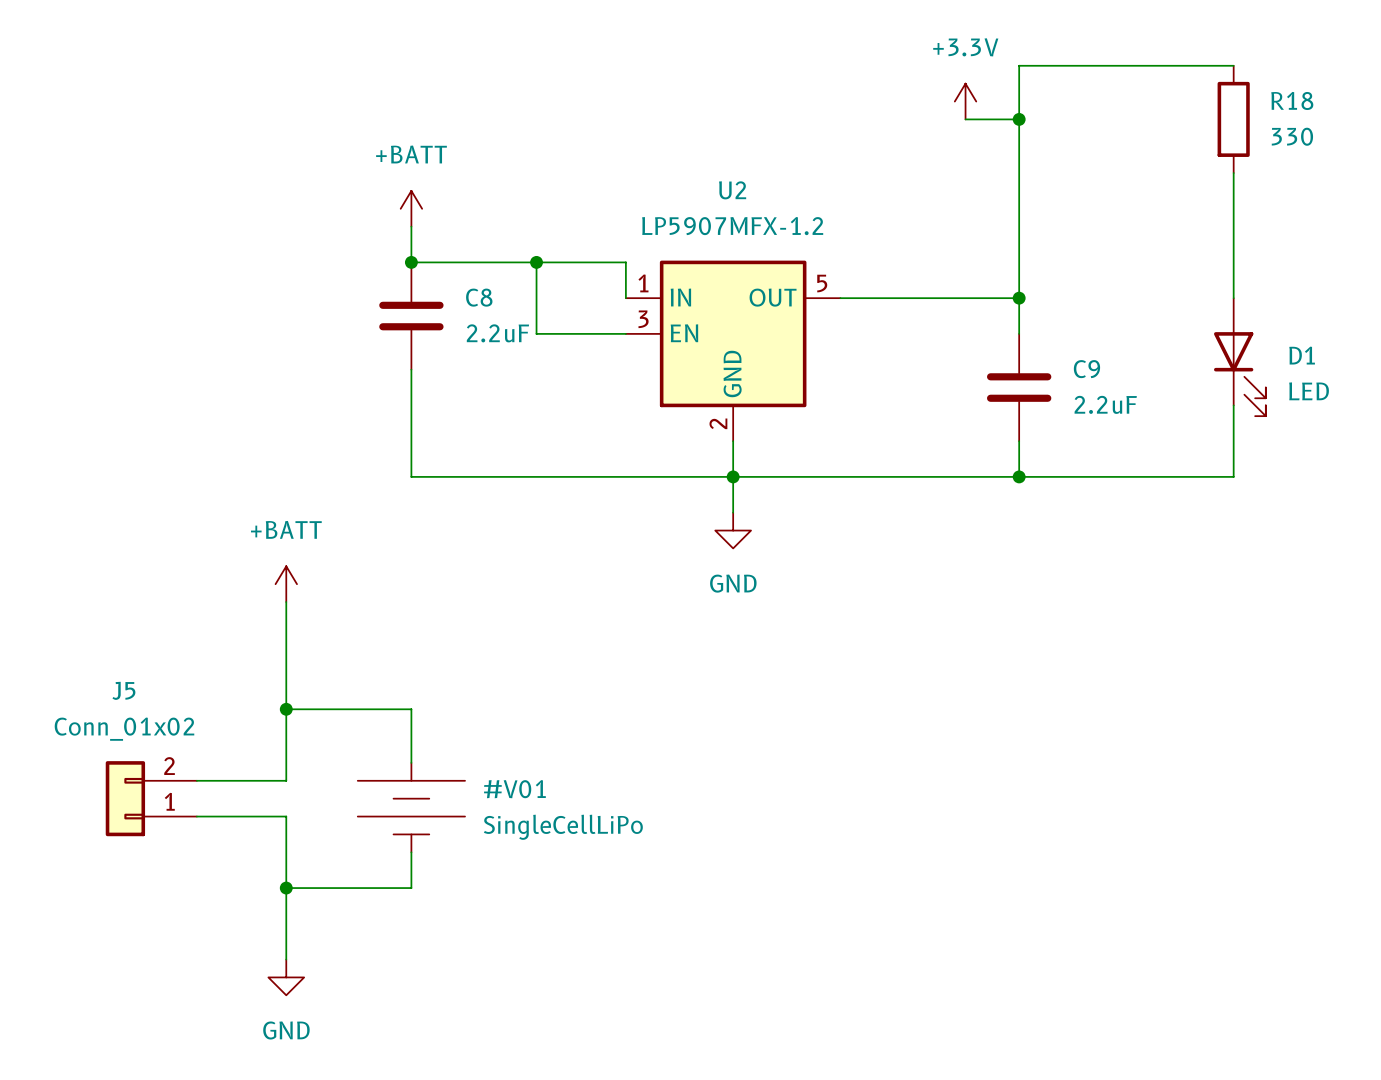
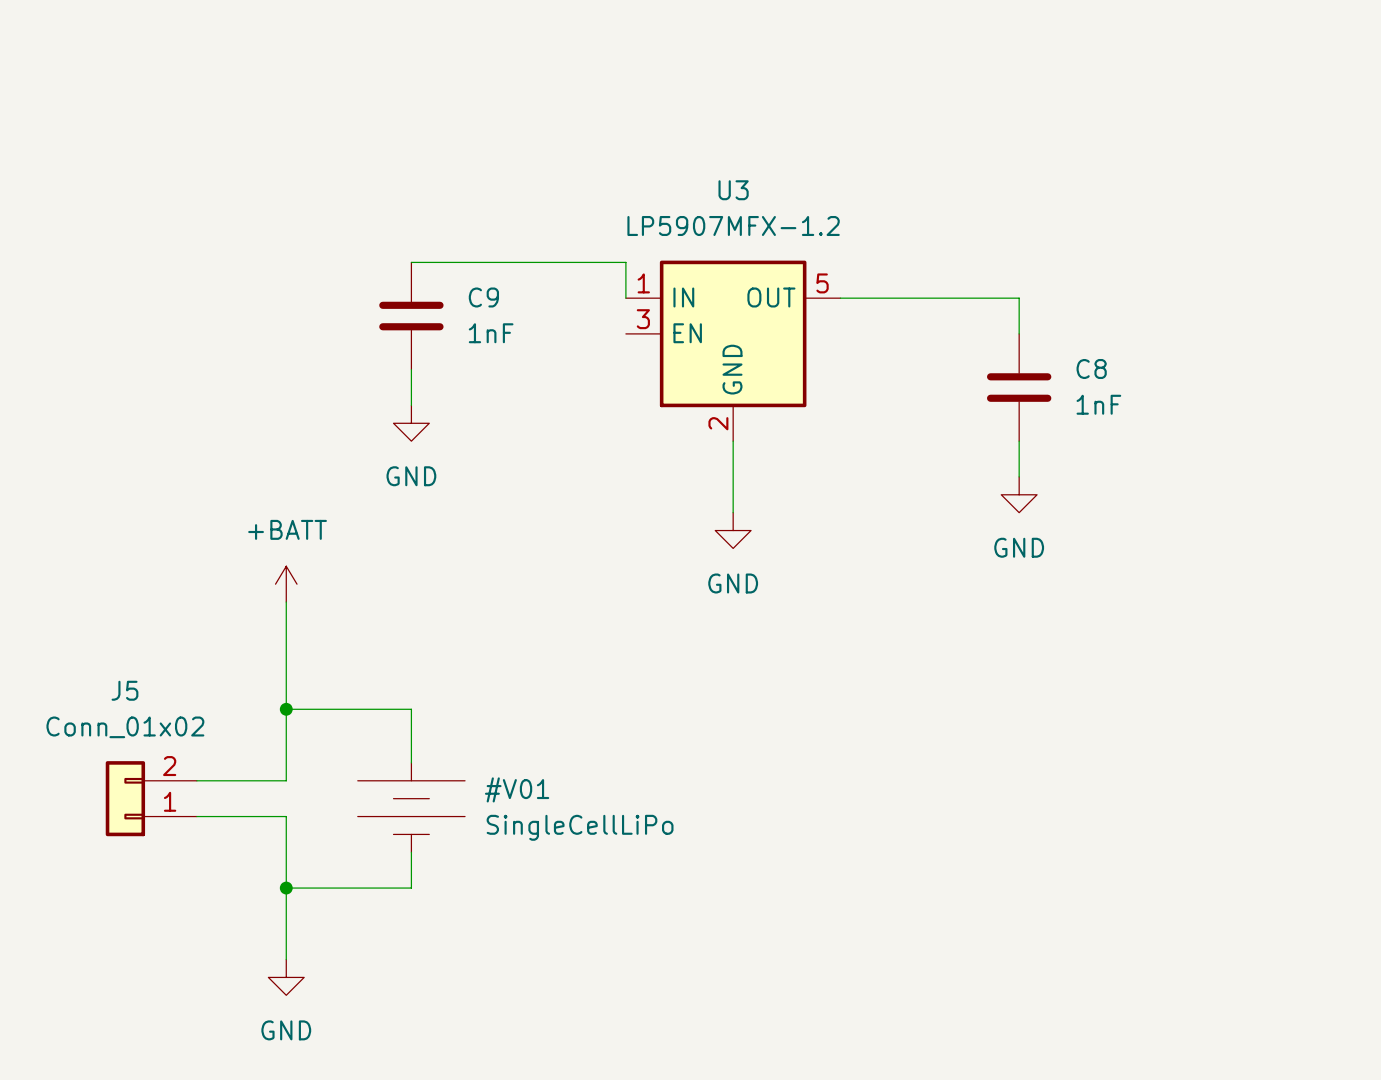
wire: (1233, 65) (1019, 65) (1019, 298) -> none
power symbol: +3.3V (965, 101) -> none
wire: (965, 119) (1019, 119) -> none
junction: (1019, 119) -> none
R18: 330 (1233, 119) -> none
wire: (1233, 173) (1233, 298) -> none
U2 name: U2 (732, 190) -> U3 (733, 190)
power symbol: +BATT (411, 208) -> none
wire: (411, 226) (411, 262) -> none
junction: (411, 262) -> none
wire: (536, 262) (536, 333) (625, 333) -> none
junction: (536, 262) -> none
C8 name: C8 (479, 297) -> C9 (483, 297)
junction: (1019, 298) -> none
C8 value: 2.2uF (497, 333) -> 1nF (491, 333)
D1: LED (1239, 357) -> none
C9 name: C9 (1086, 369) -> C8 (1091, 368)
C9 value: 2.2uF (1105, 404) -> 1nF (1098, 404)
wire: (411, 405) (411, 476) (1233, 476) (1233, 405) -> none
power symbol: none -> GND (411, 423)
junction: (733, 476) -> none
junction: (1019, 476) -> none
power symbol: none -> GND (1019, 494)

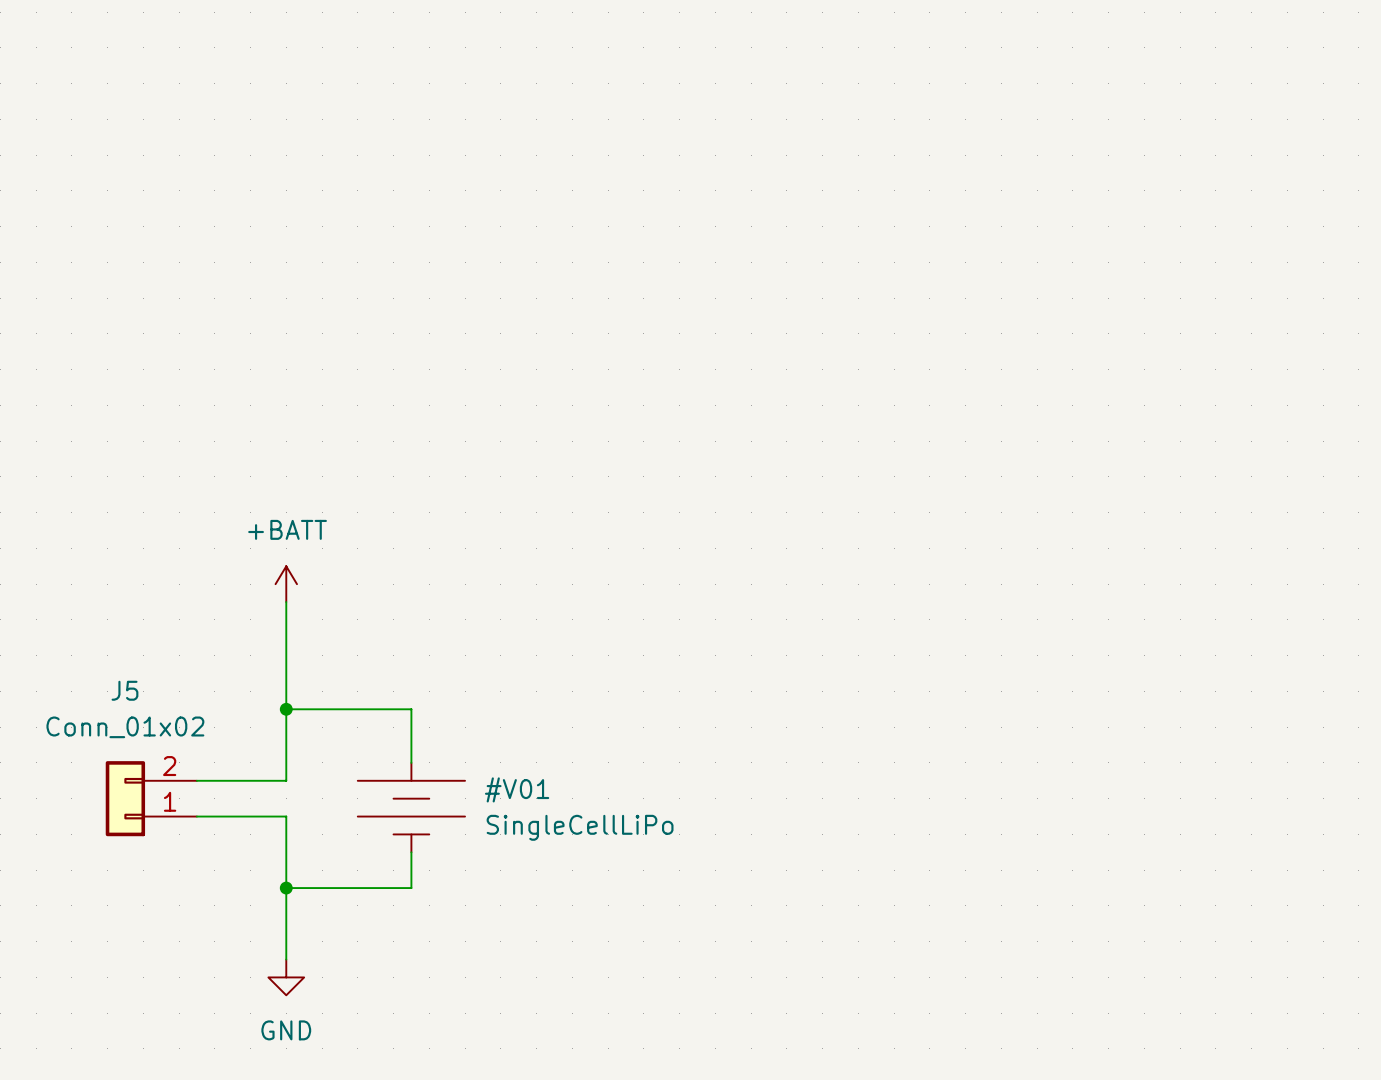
wire: (411, 262) (625, 262) (625, 298) -> none
wire: (840, 298) (1019, 298) (1019, 333) -> none
C9: 1nF (411, 316) -> none
U3: LP5907MFX-1.2 (733, 350) -> none
wire: (411, 369) (411, 405) -> none
C8: 1nF (1019, 387) -> none
power symbol: GND (411, 423) -> none
wire: (733, 441) (733, 512) -> none
wire: (1019, 441) (1019, 476) -> none
power symbol: GND (1019, 494) -> none
power symbol: GND (733, 530) -> none

